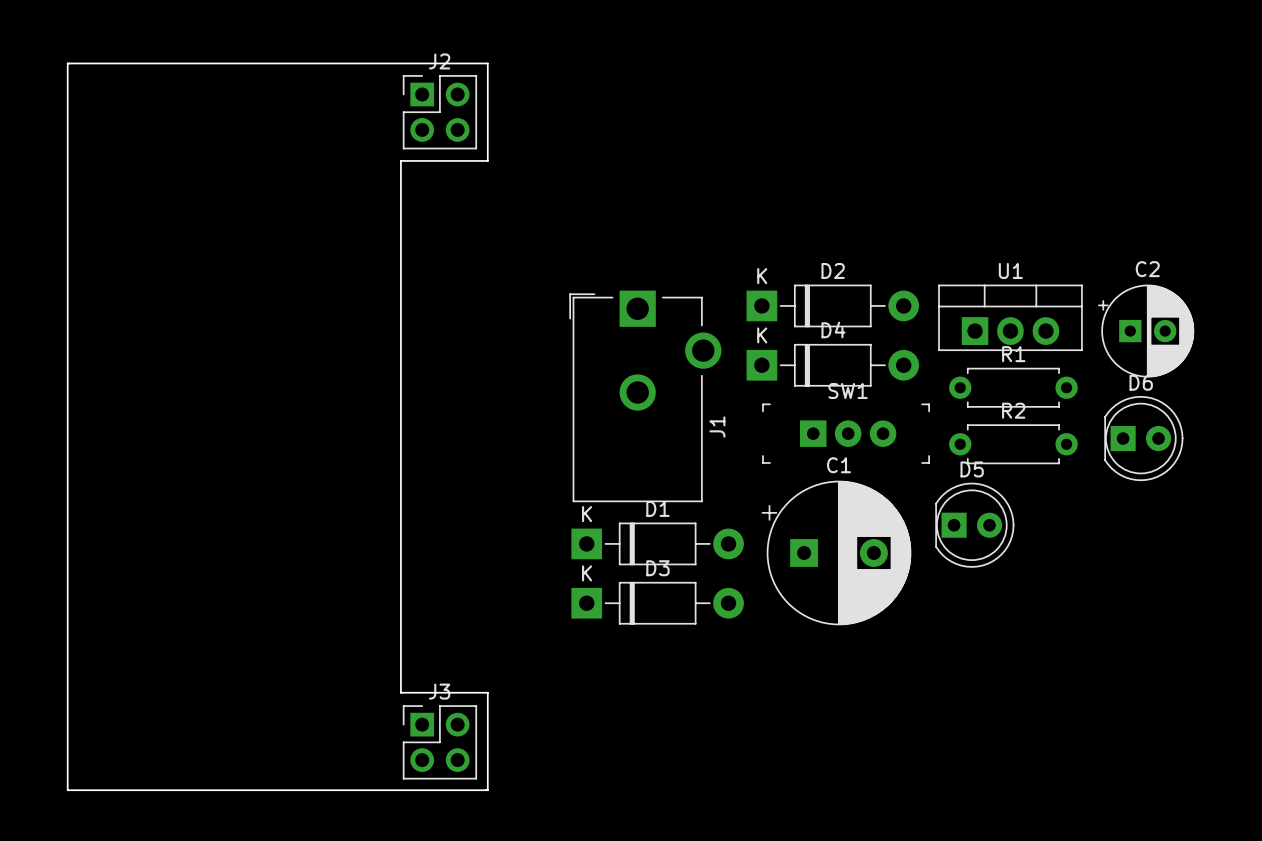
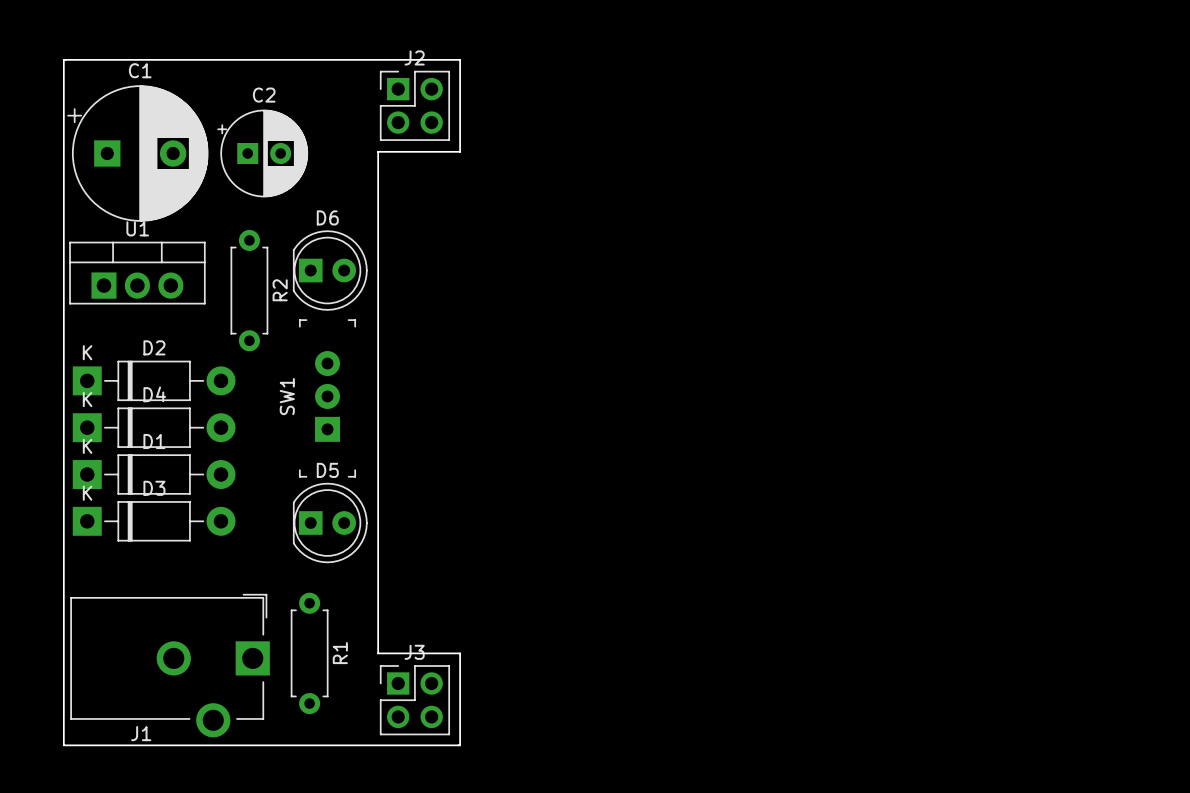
D2 position: (832, 305) -> (154, 380)
U1 position: (1010, 317) -> (137, 273)
C2 position: (1146, 331) -> (262, 153)
D4 position: (832, 365) -> (154, 427)
R1 rotation: 0° (1013, 387) -> 90° clockwise (309, 653)
R1 position: (1013, 387) -> (309, 653)
D6 footprint: [1104, 395, 1184, 482] -> [292, 230, 368, 311]
J1 rotation: 0° (645, 396) -> 90° clockwise (170, 665)
J1 position: (645, 396) -> (170, 665)
SW1 rotation: 0° (846, 433) -> 90° counterclockwise (327, 398)
SW1 position: (846, 433) -> (327, 398)
R2 rotation: 0° (1013, 444) -> 90° clockwise (249, 290)
R2 position: (1013, 444) -> (249, 290)
D5 position: (974, 525) -> (330, 522)
D1 position: (657, 543) -> (154, 474)
C1 position: (836, 552) -> (137, 153)
D3 position: (657, 603) -> (154, 521)

